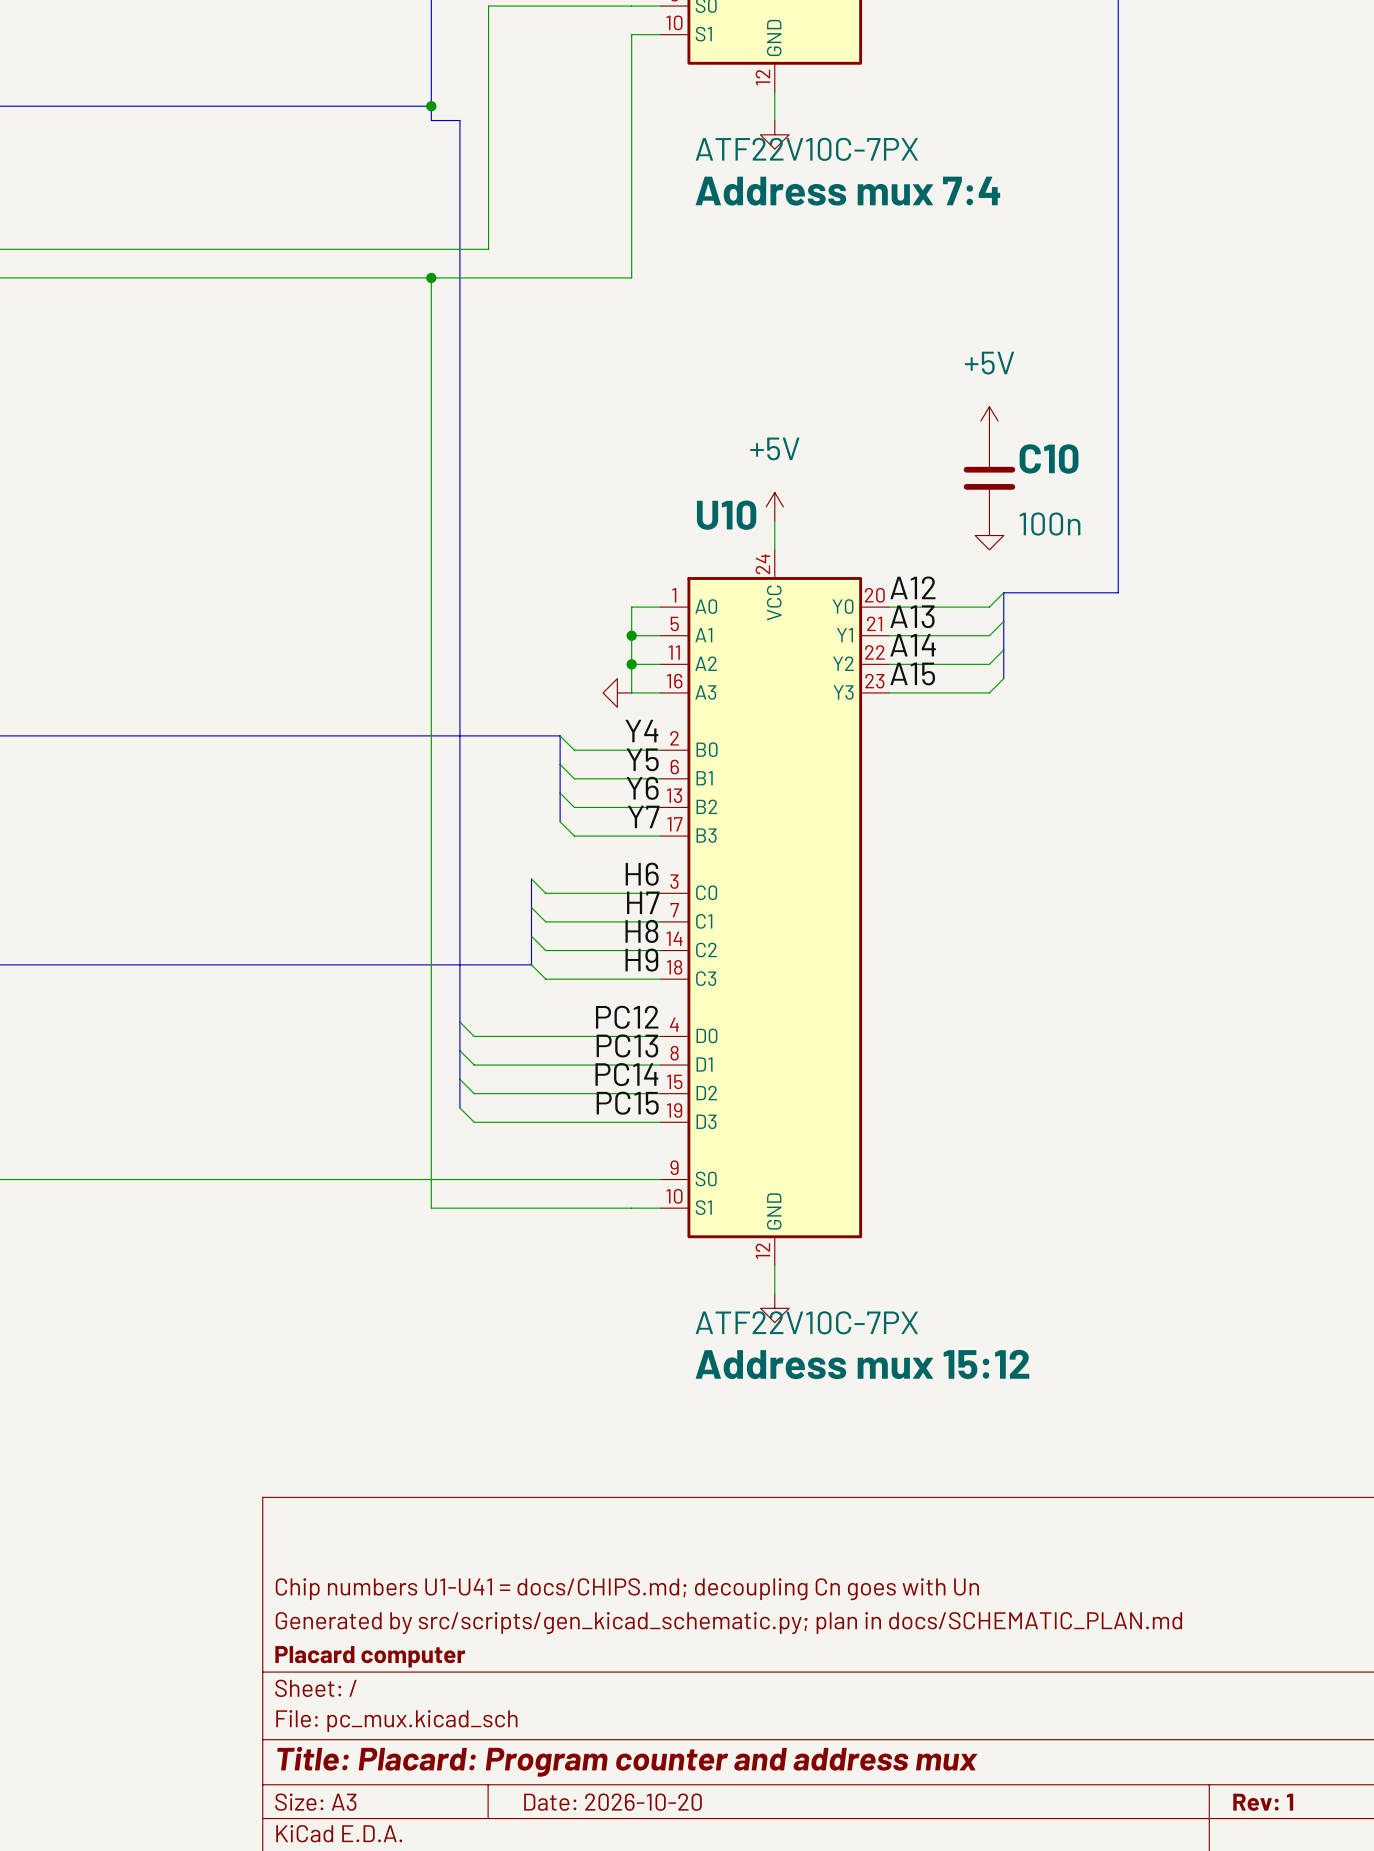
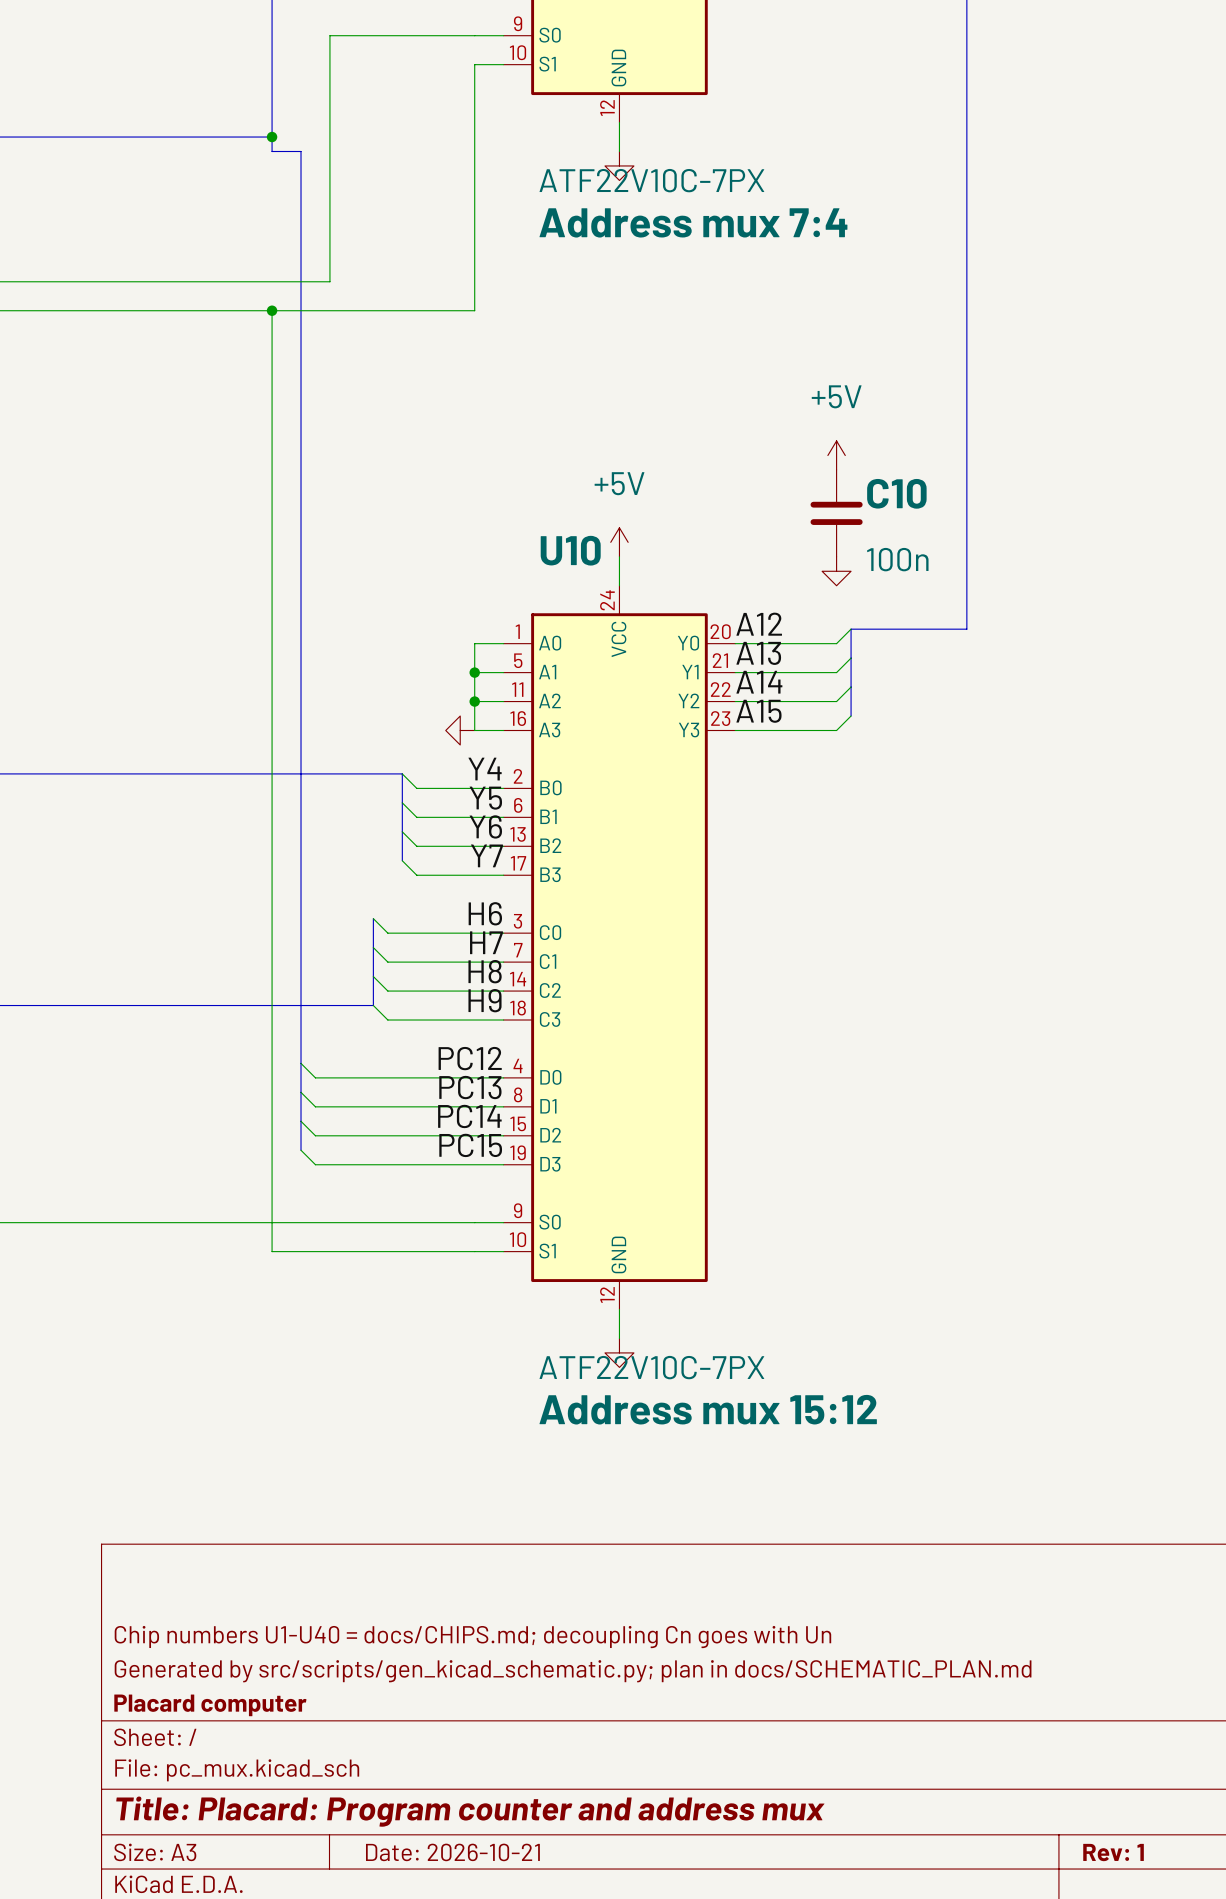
title block: Chip numbers U1-U41 = docs/CHIPS.md; decoupling Cn goes with Un (627, 1589) -> Chip numbers U1-U40 = docs/CHIPS.md; decoupling Cn goes with Un (472, 1637)
title block: Date: 2026-10-20 (613, 1802) -> Date: 2026-10-21 (452, 1852)

